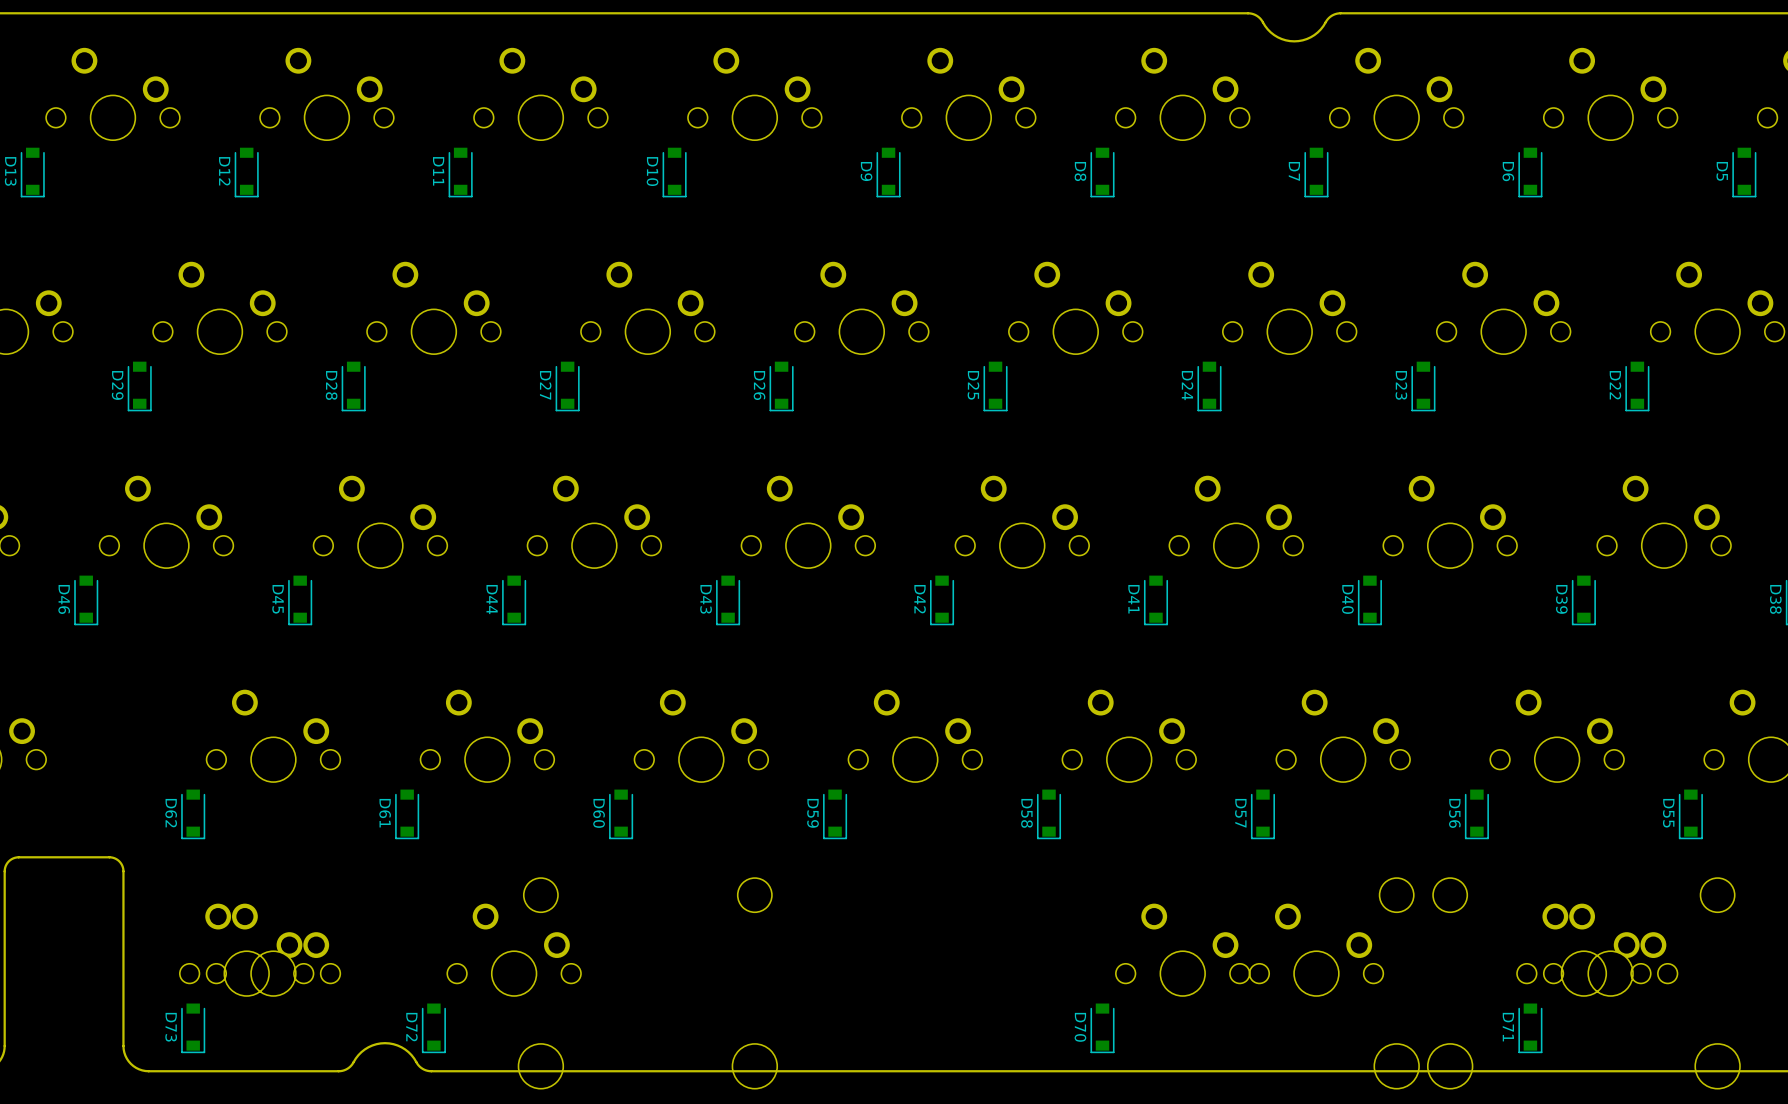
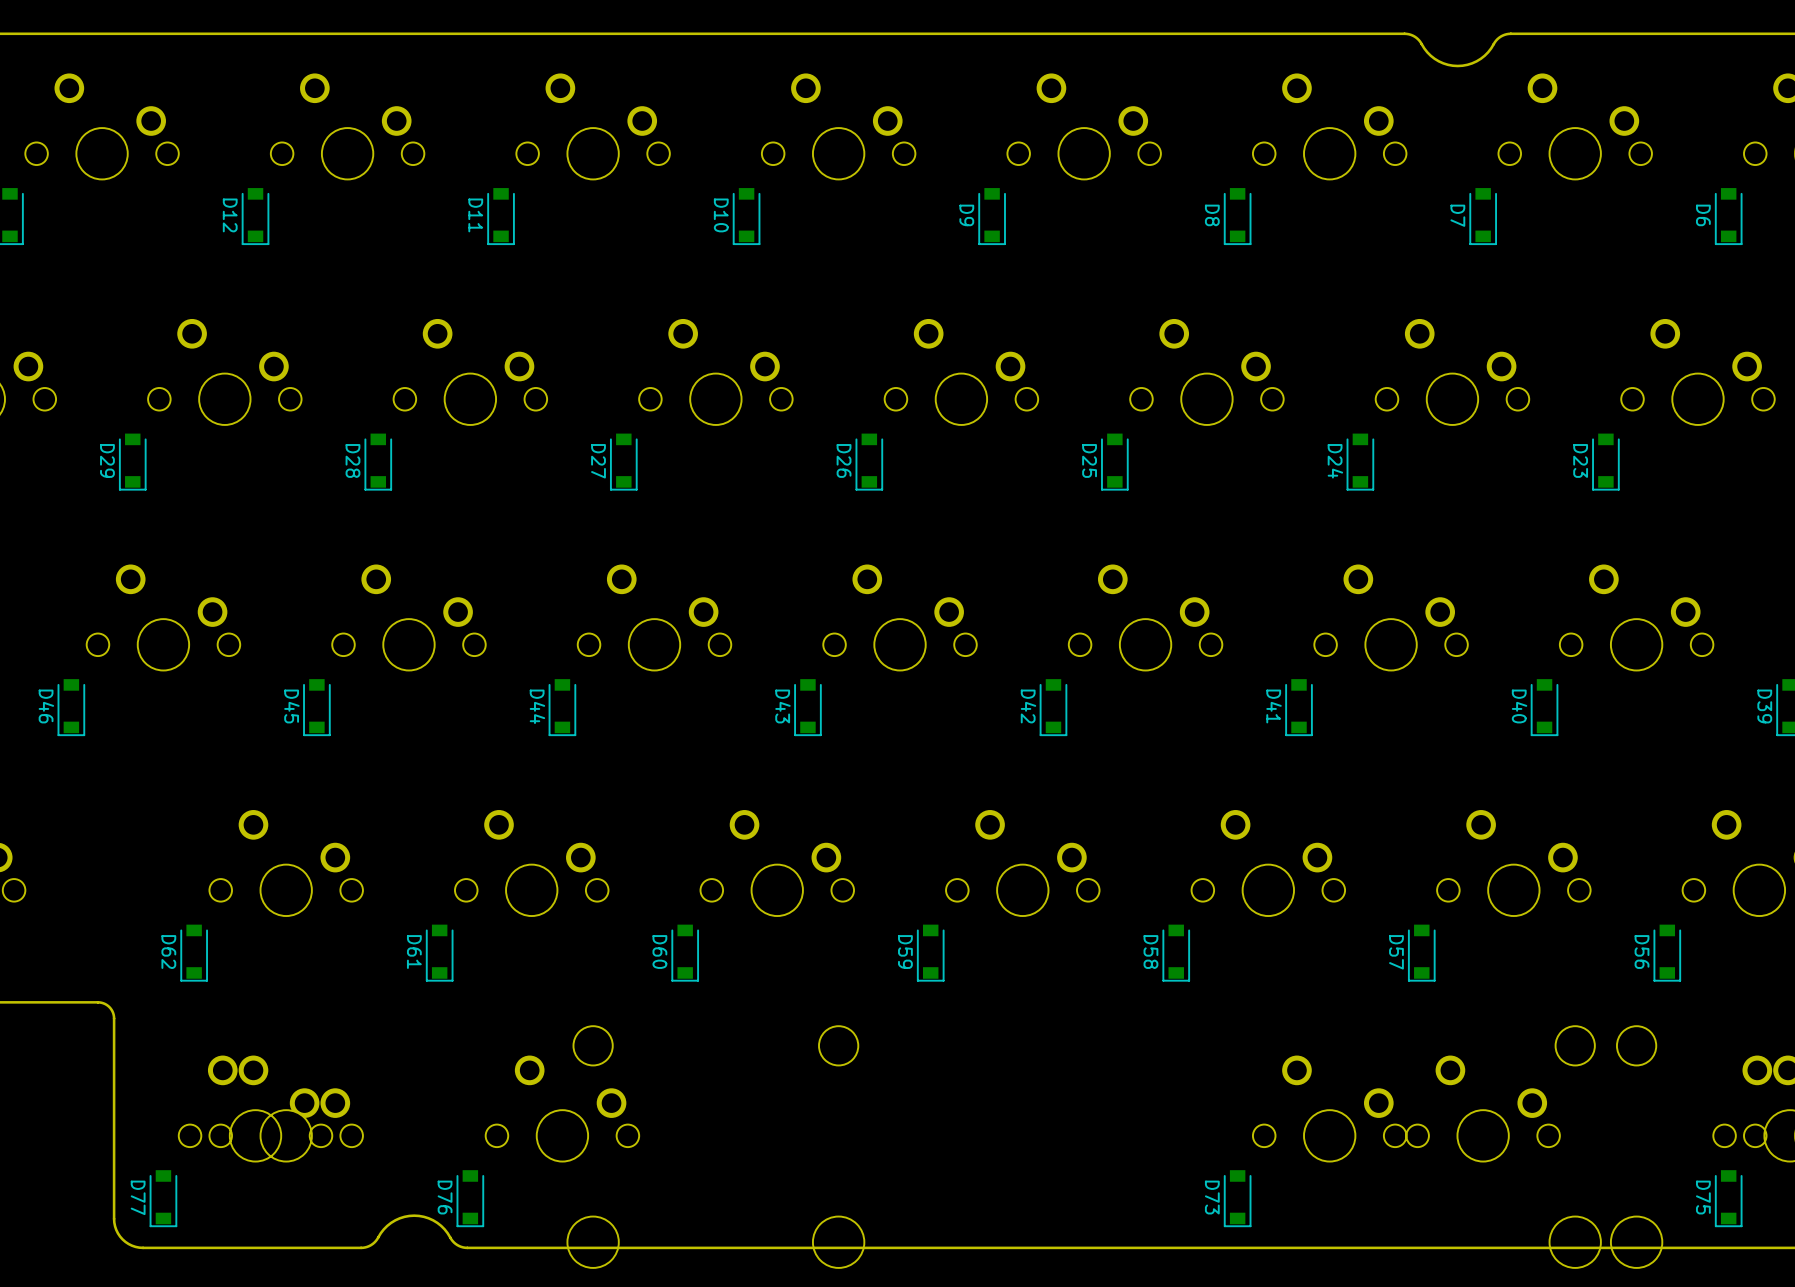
D72 name: D72 (411, 1027) -> D76 (445, 1197)
D70 name: D70 (1080, 1027) -> D73 (1212, 1197)
D71 name: D71 (1508, 1027) -> D75 (1703, 1197)
D77: none -> (163, 1198)
D73: (193, 1028) -> none

